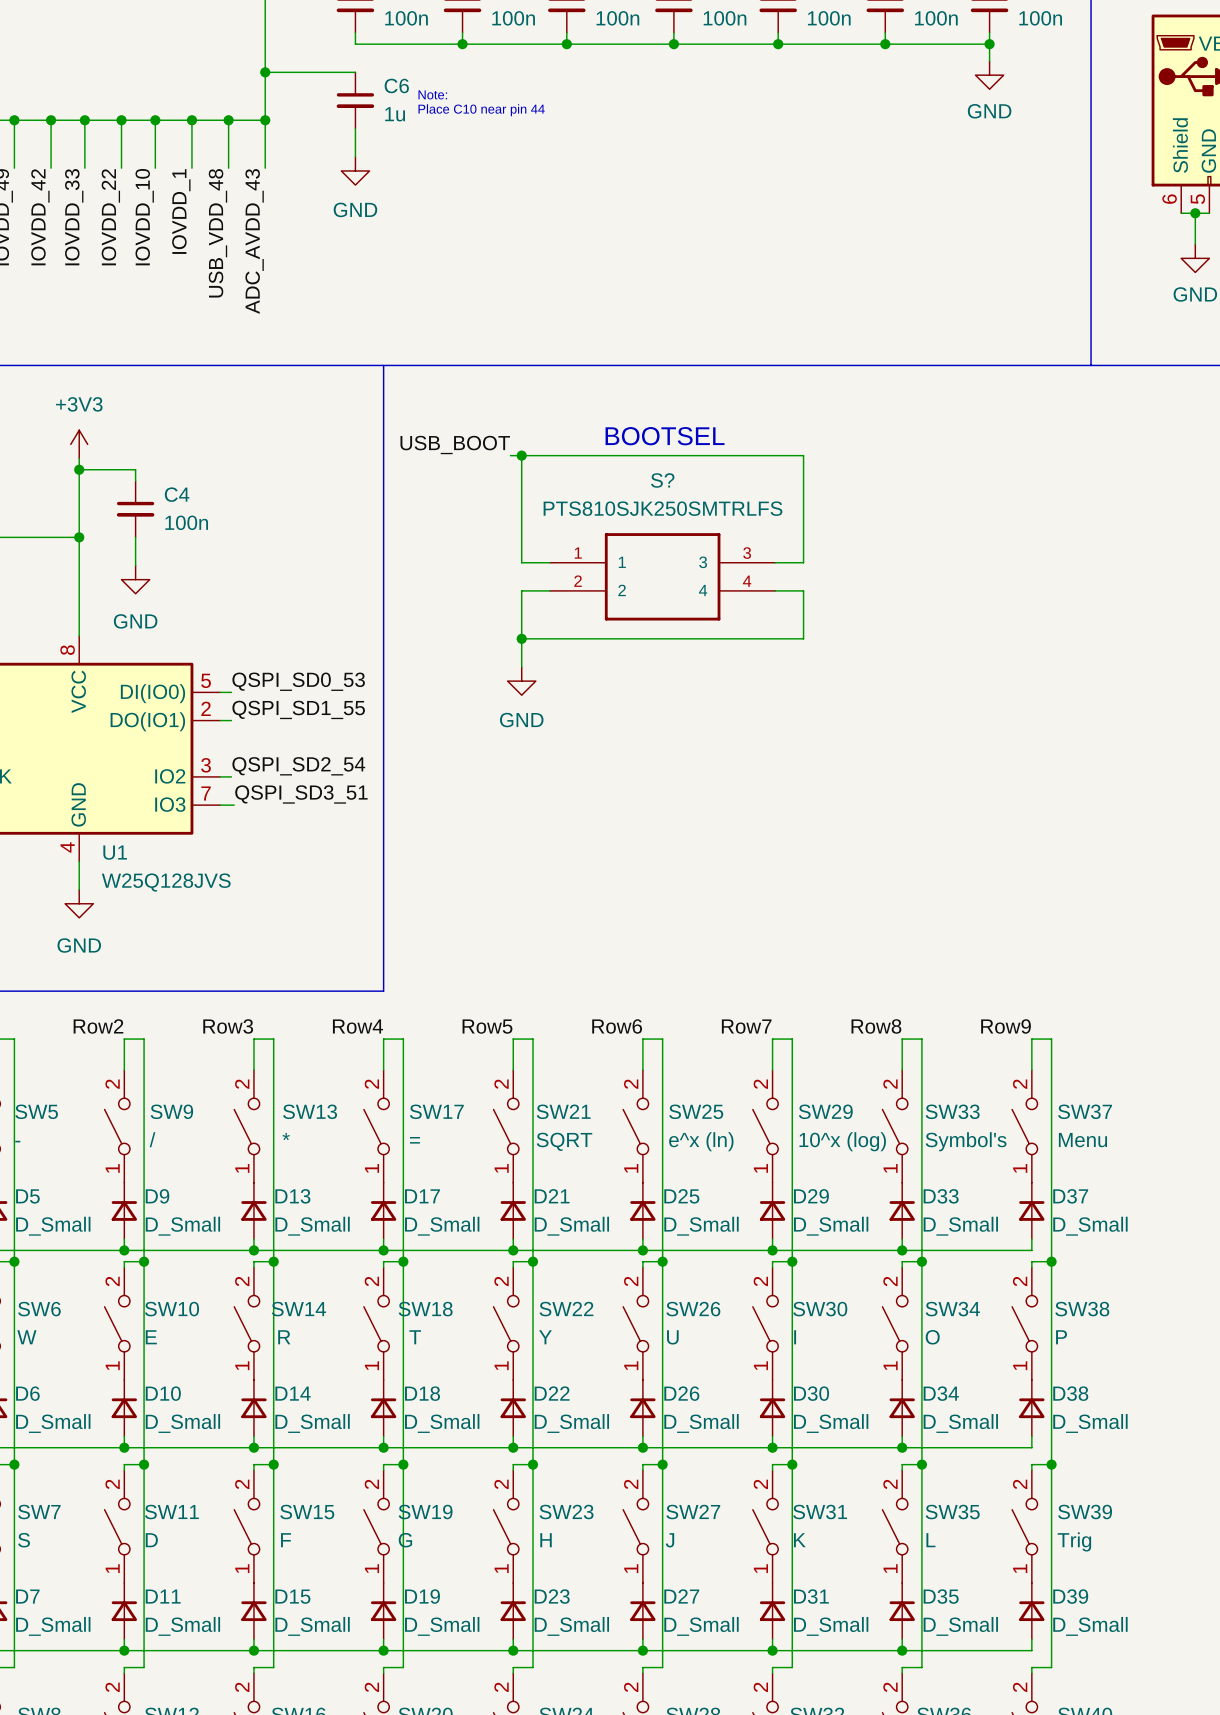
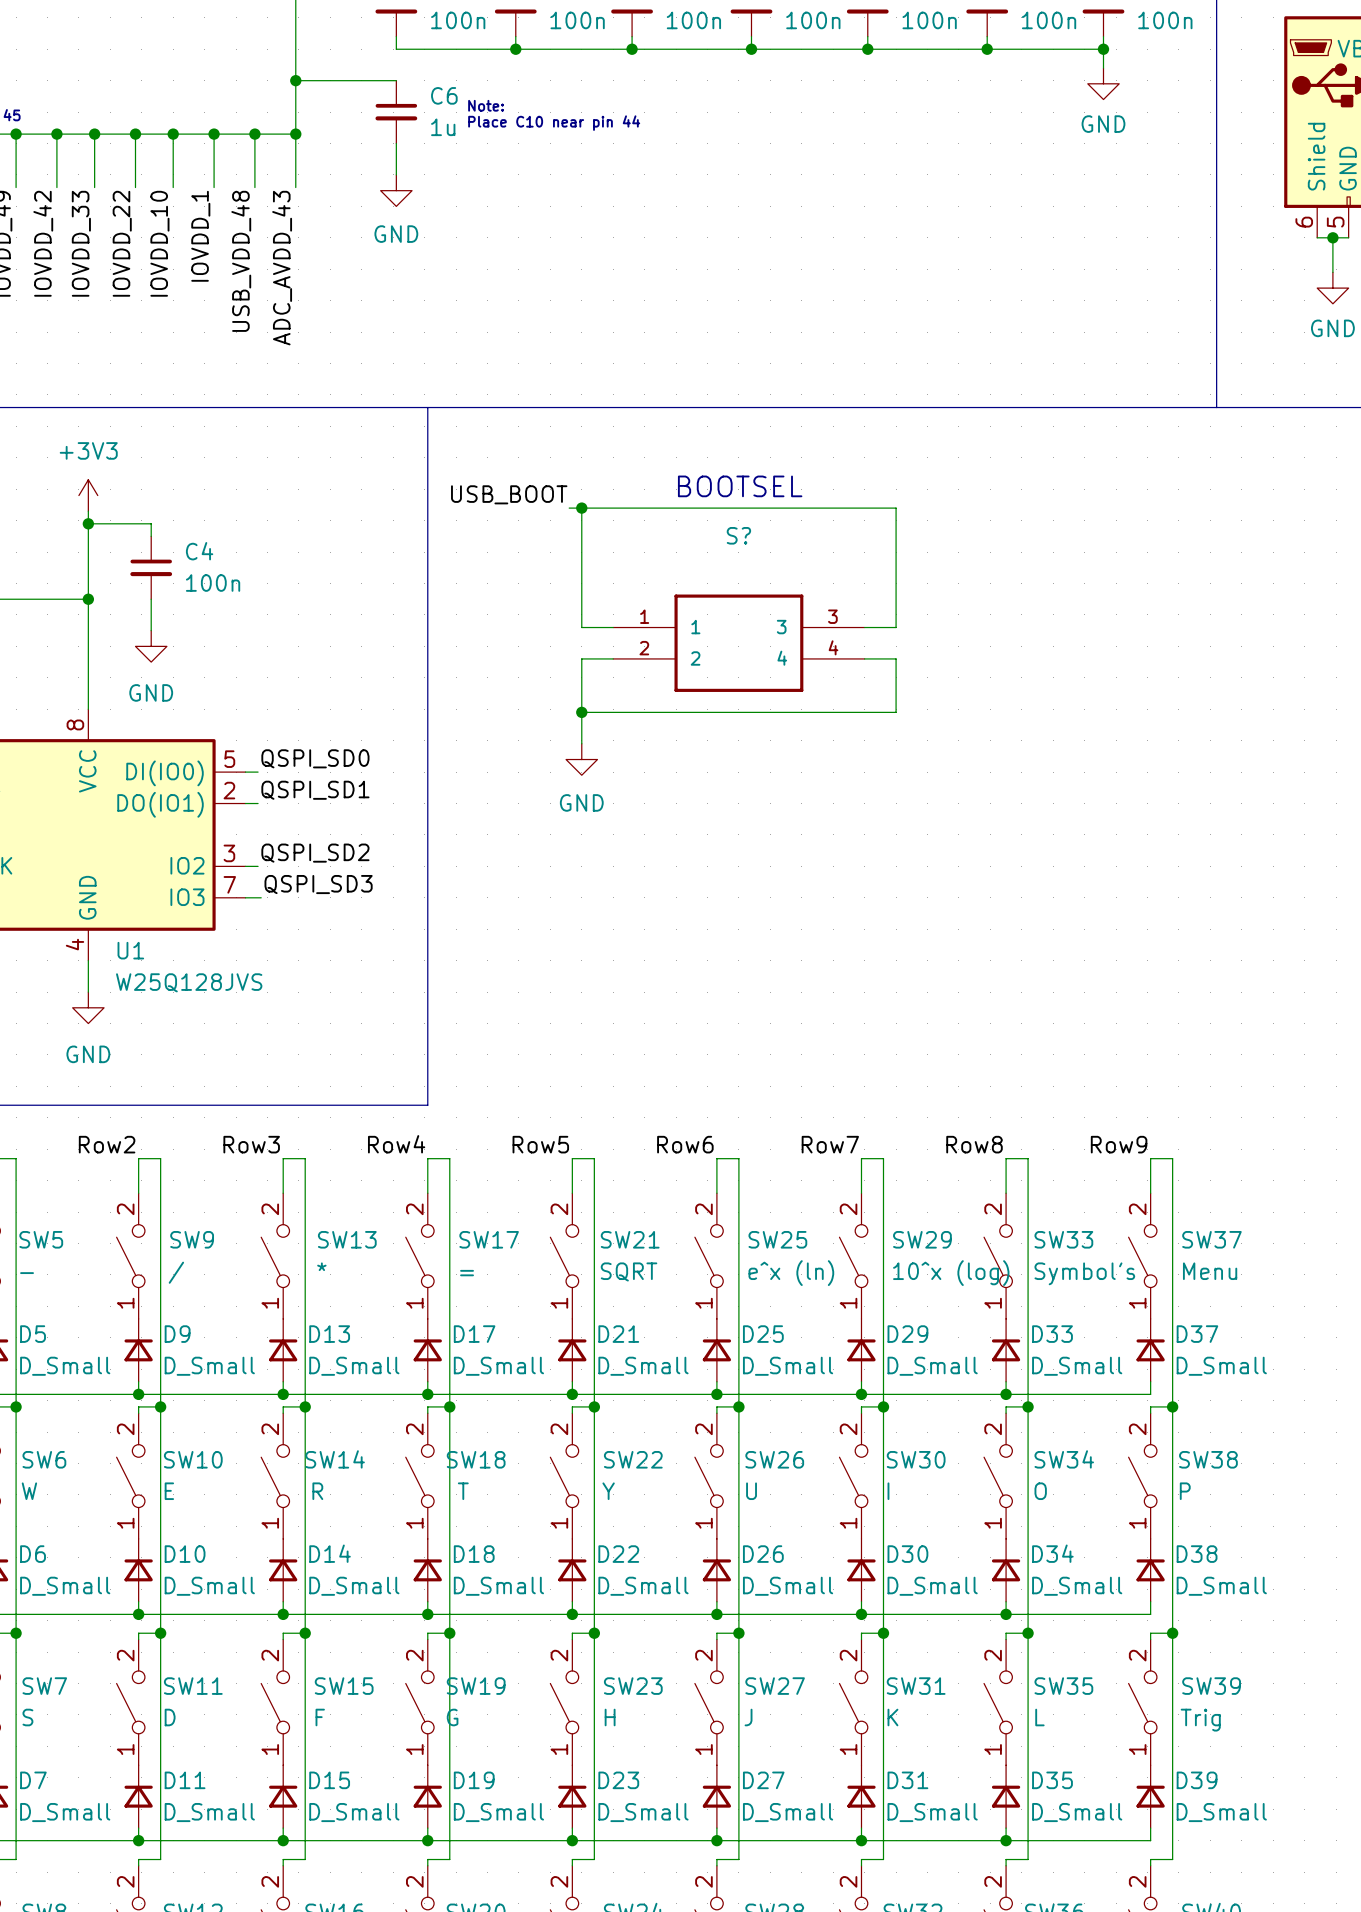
S? value: PTS810SJK250SMTRLFS (663, 508) -> none
label: QSPI_SD0_53 (298, 681) -> QSPI_SD0 (315, 758)
label: QSPI_SD1_55 (298, 709) -> QSPI_SD1 (315, 790)
label: QSPI_SD2_54 (298, 766) -> QSPI_SD2 (315, 853)
label: QSPI_SD3_51 (301, 794) -> QSPI_SD3 (318, 884)

